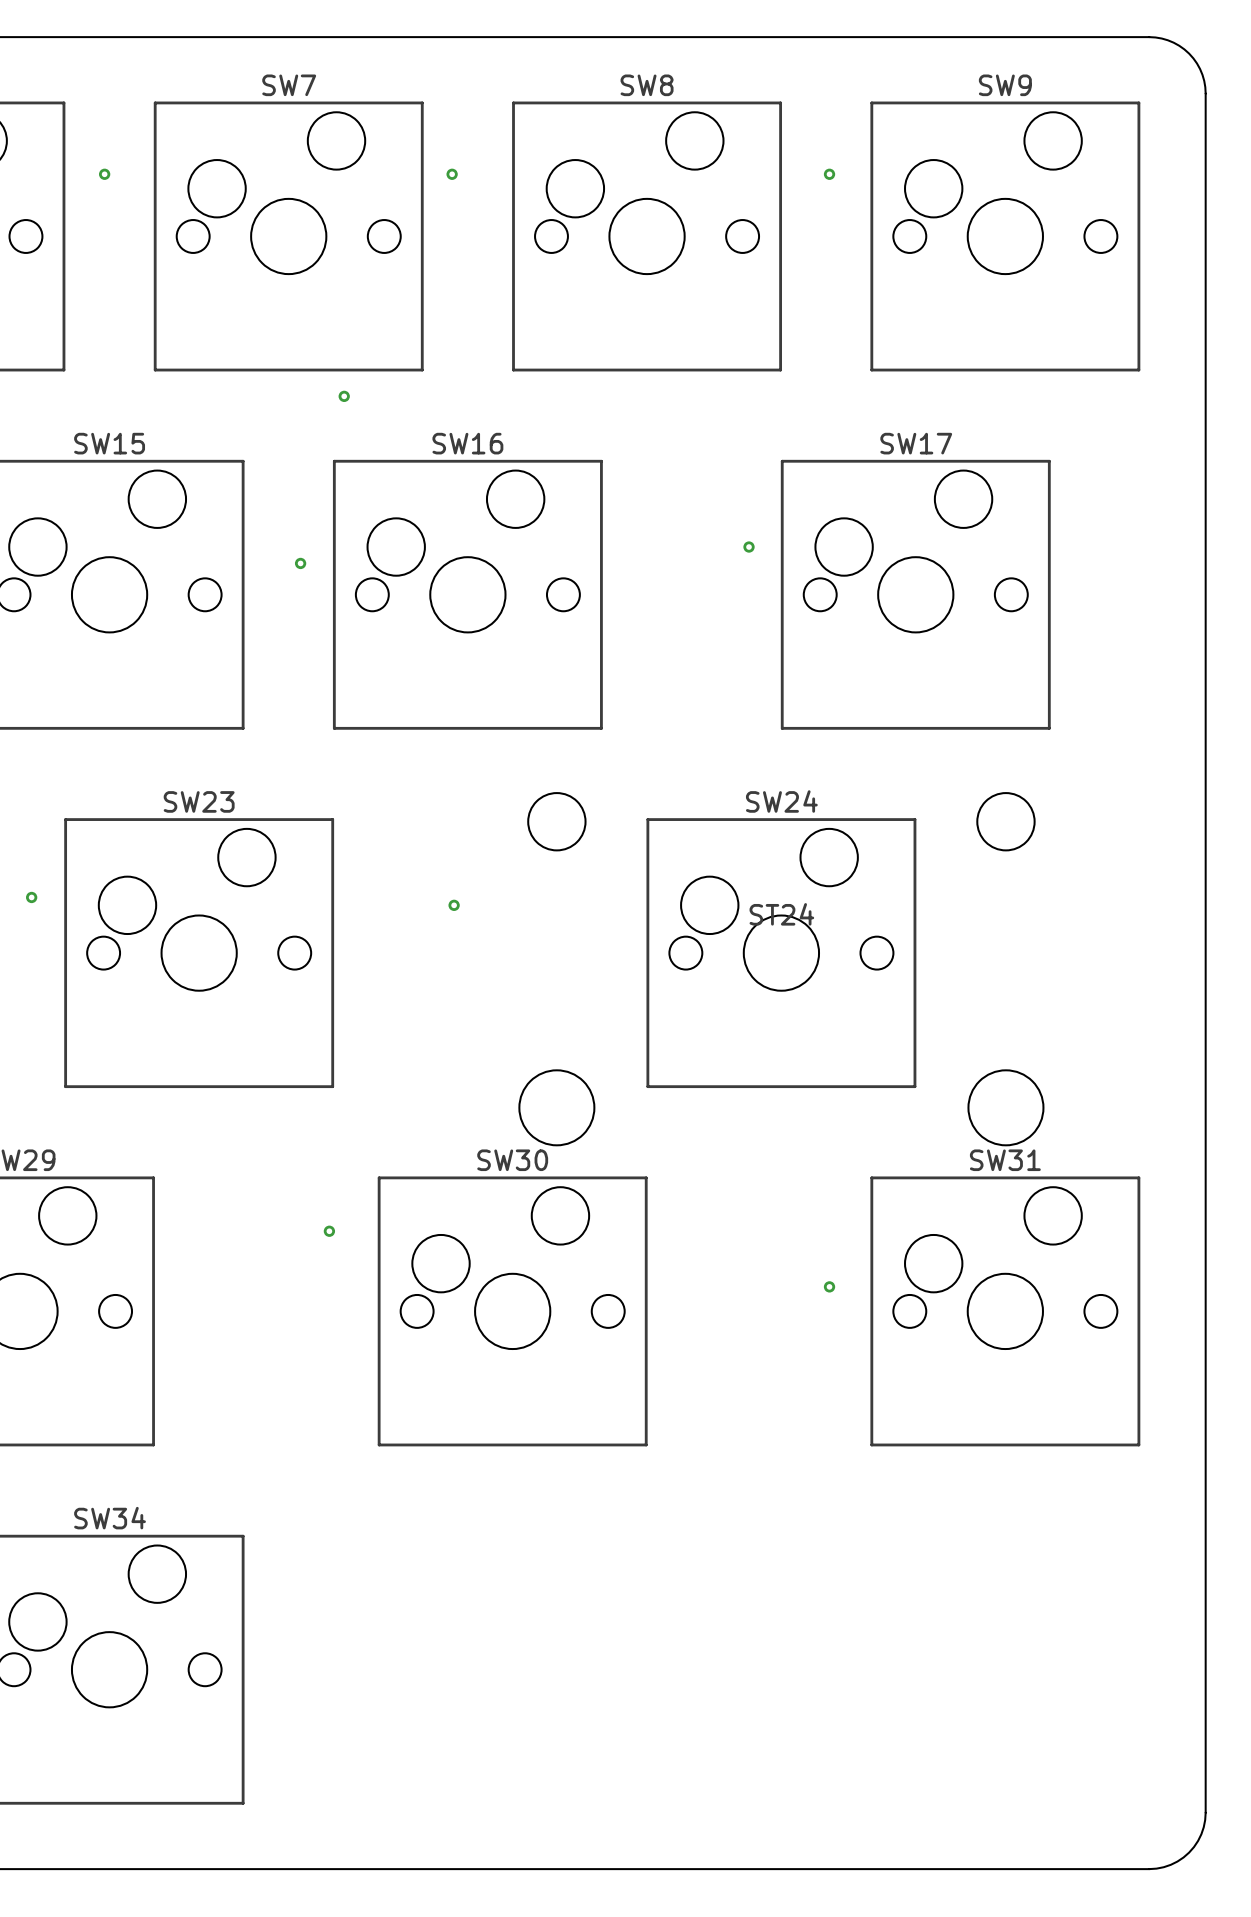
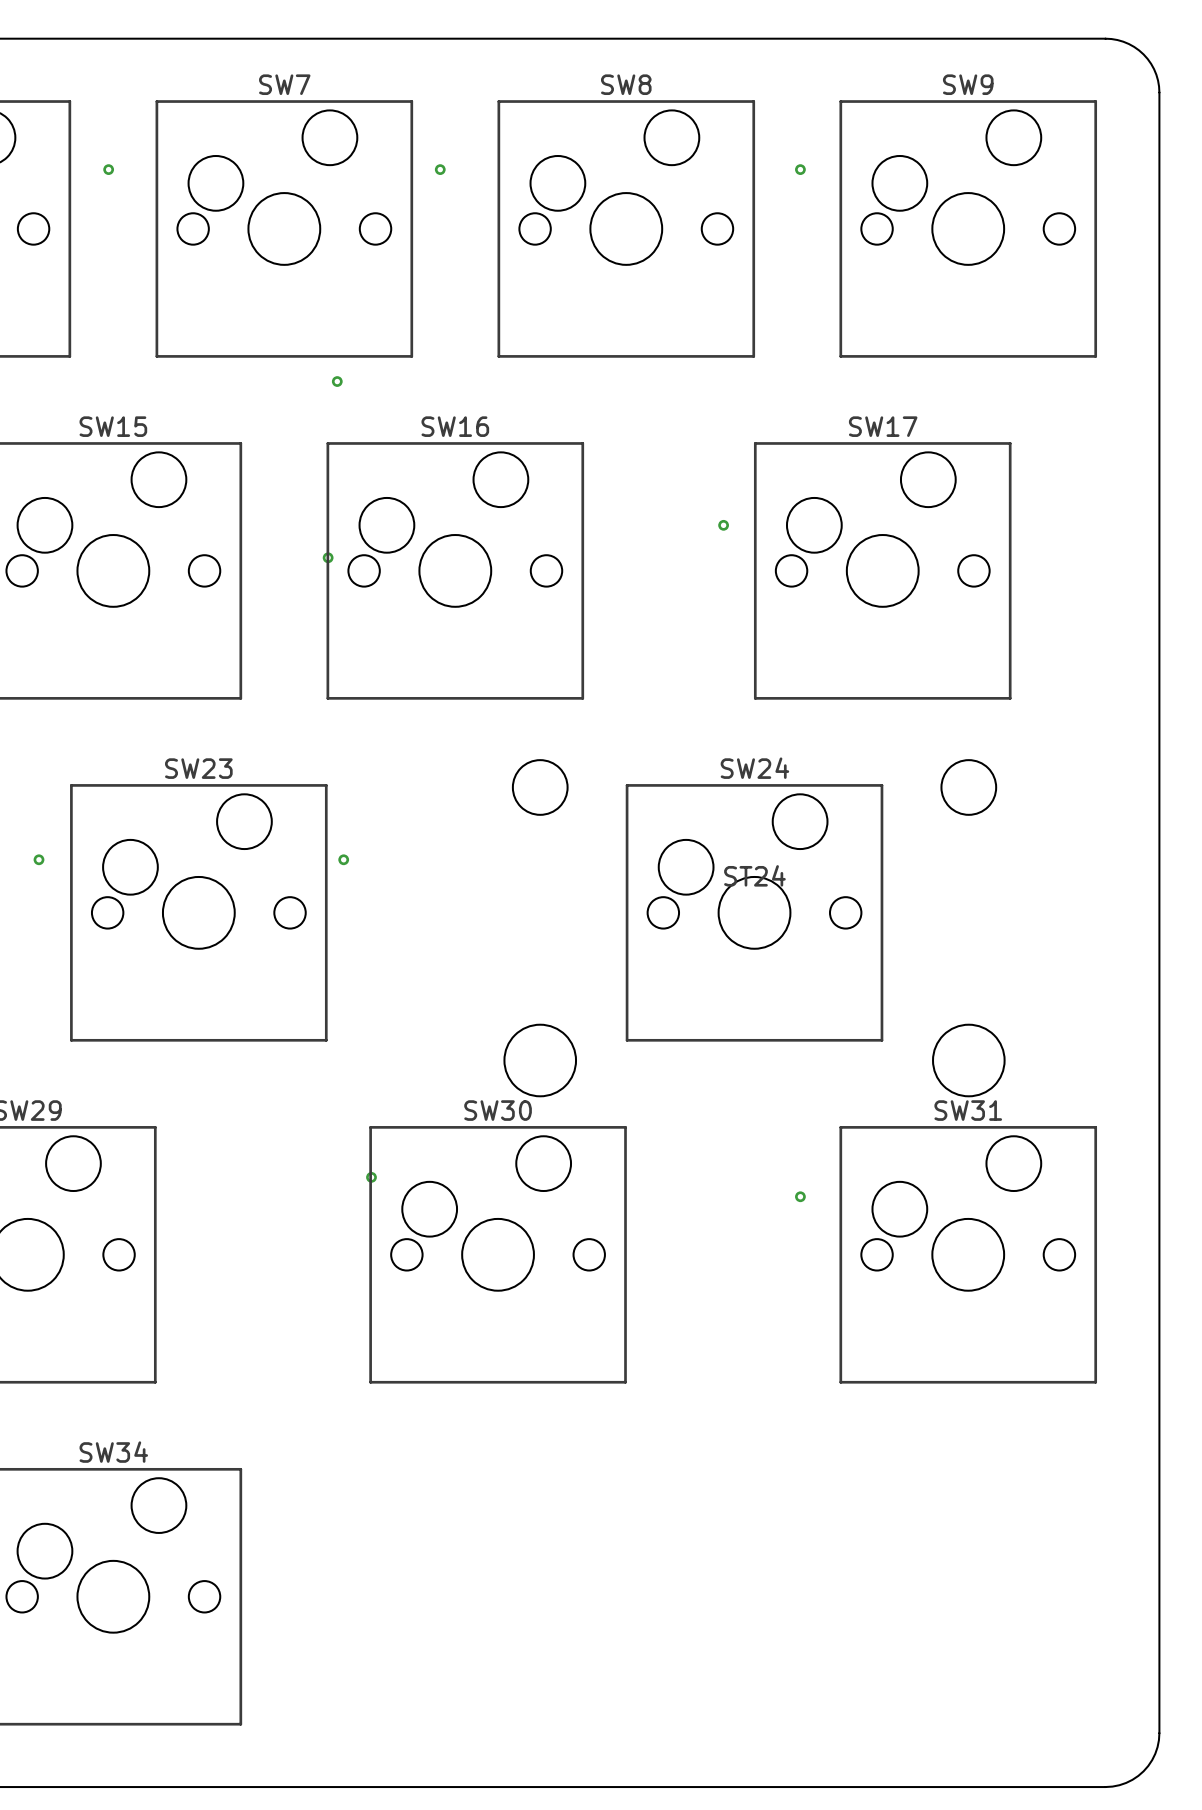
via position: (300, 563) -> (328, 557)
via position: (454, 905) -> (343, 859)
via position: (329, 1231) -> (371, 1177)
via position: (829, 1286) -> (800, 1196)

